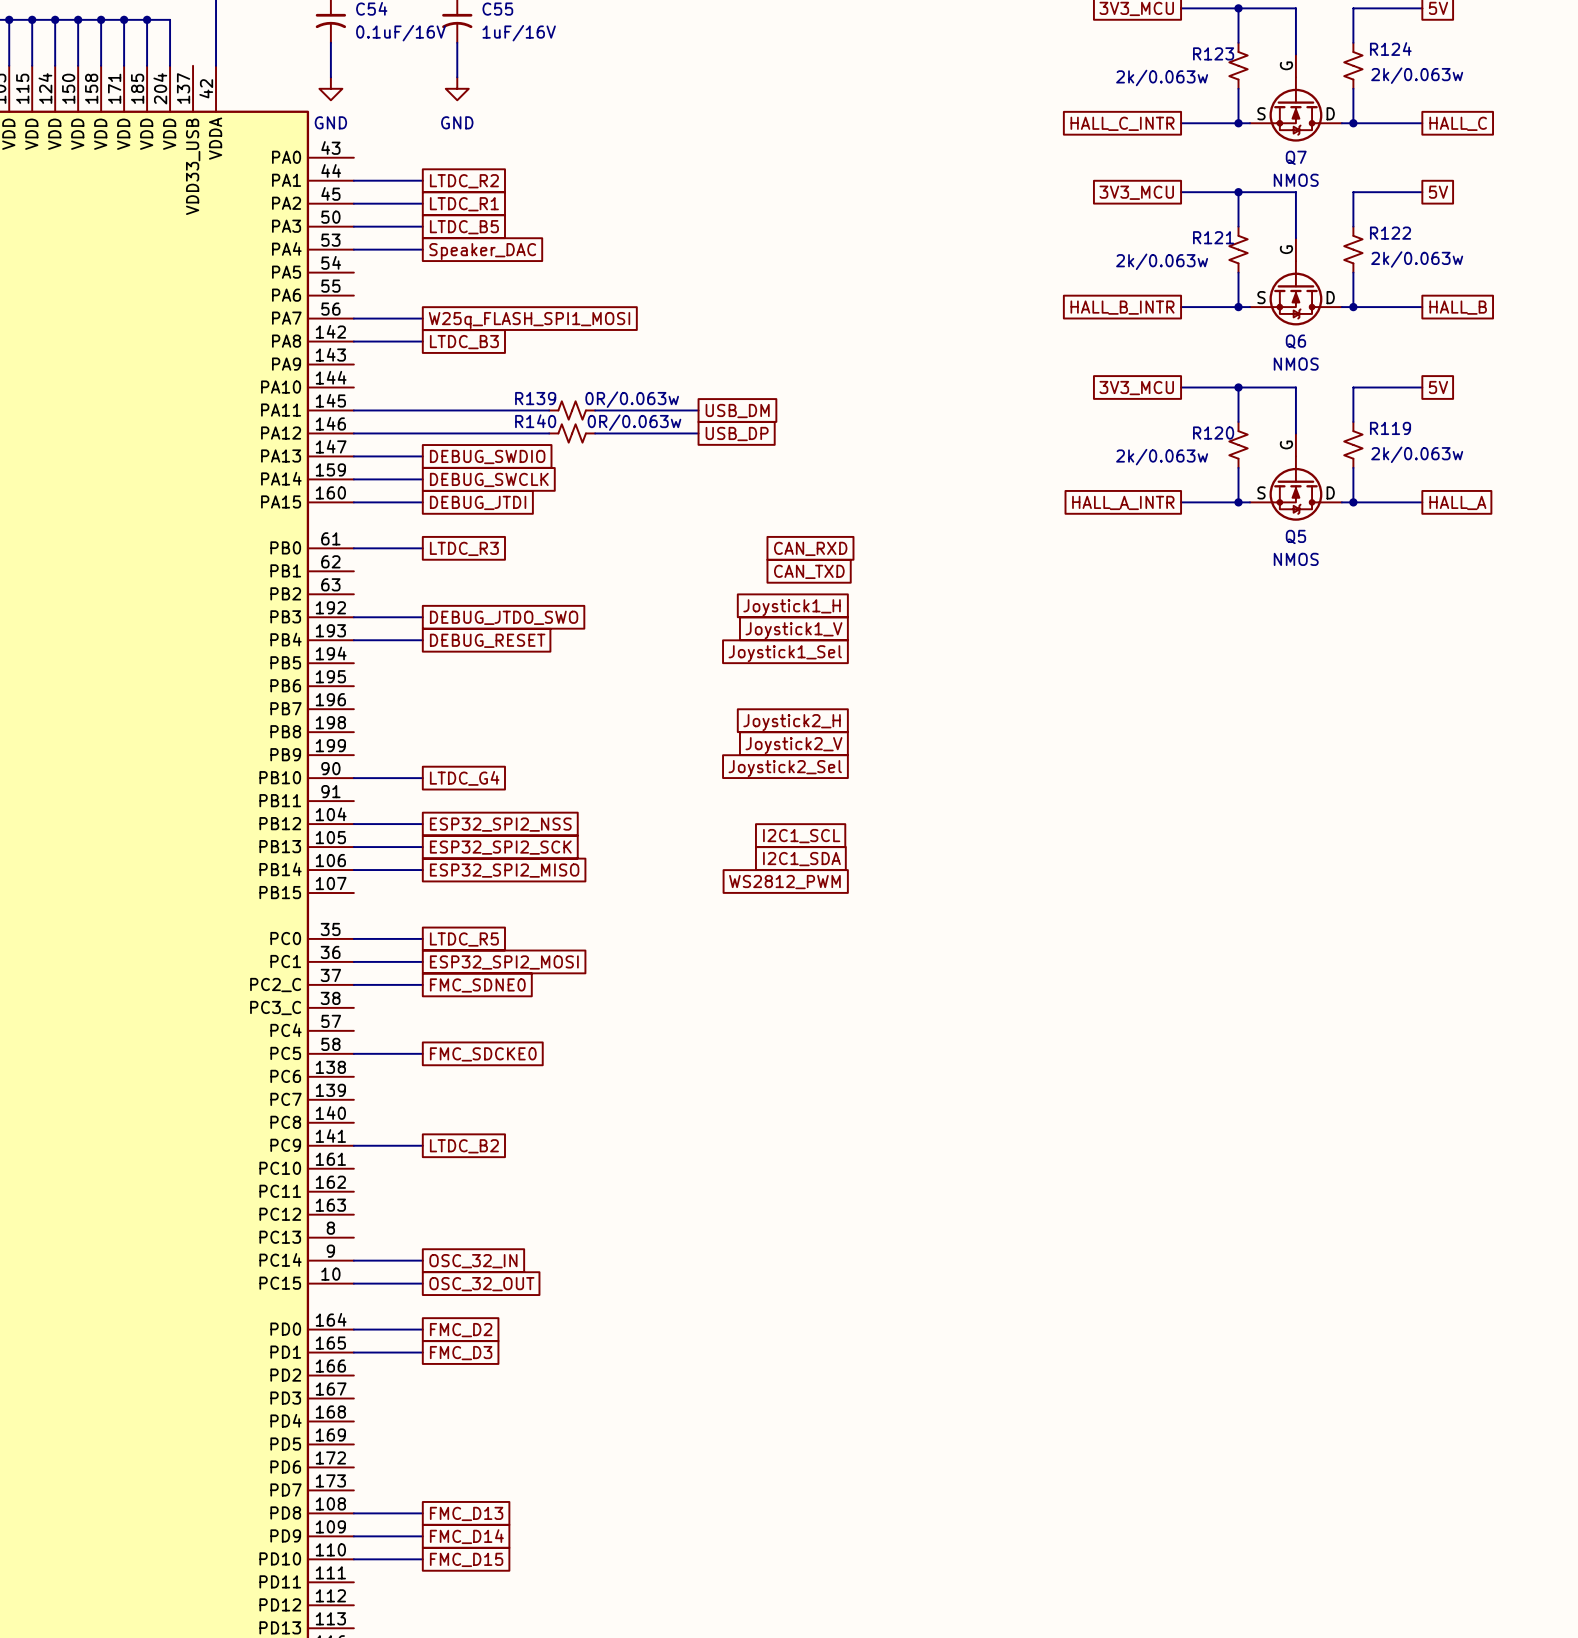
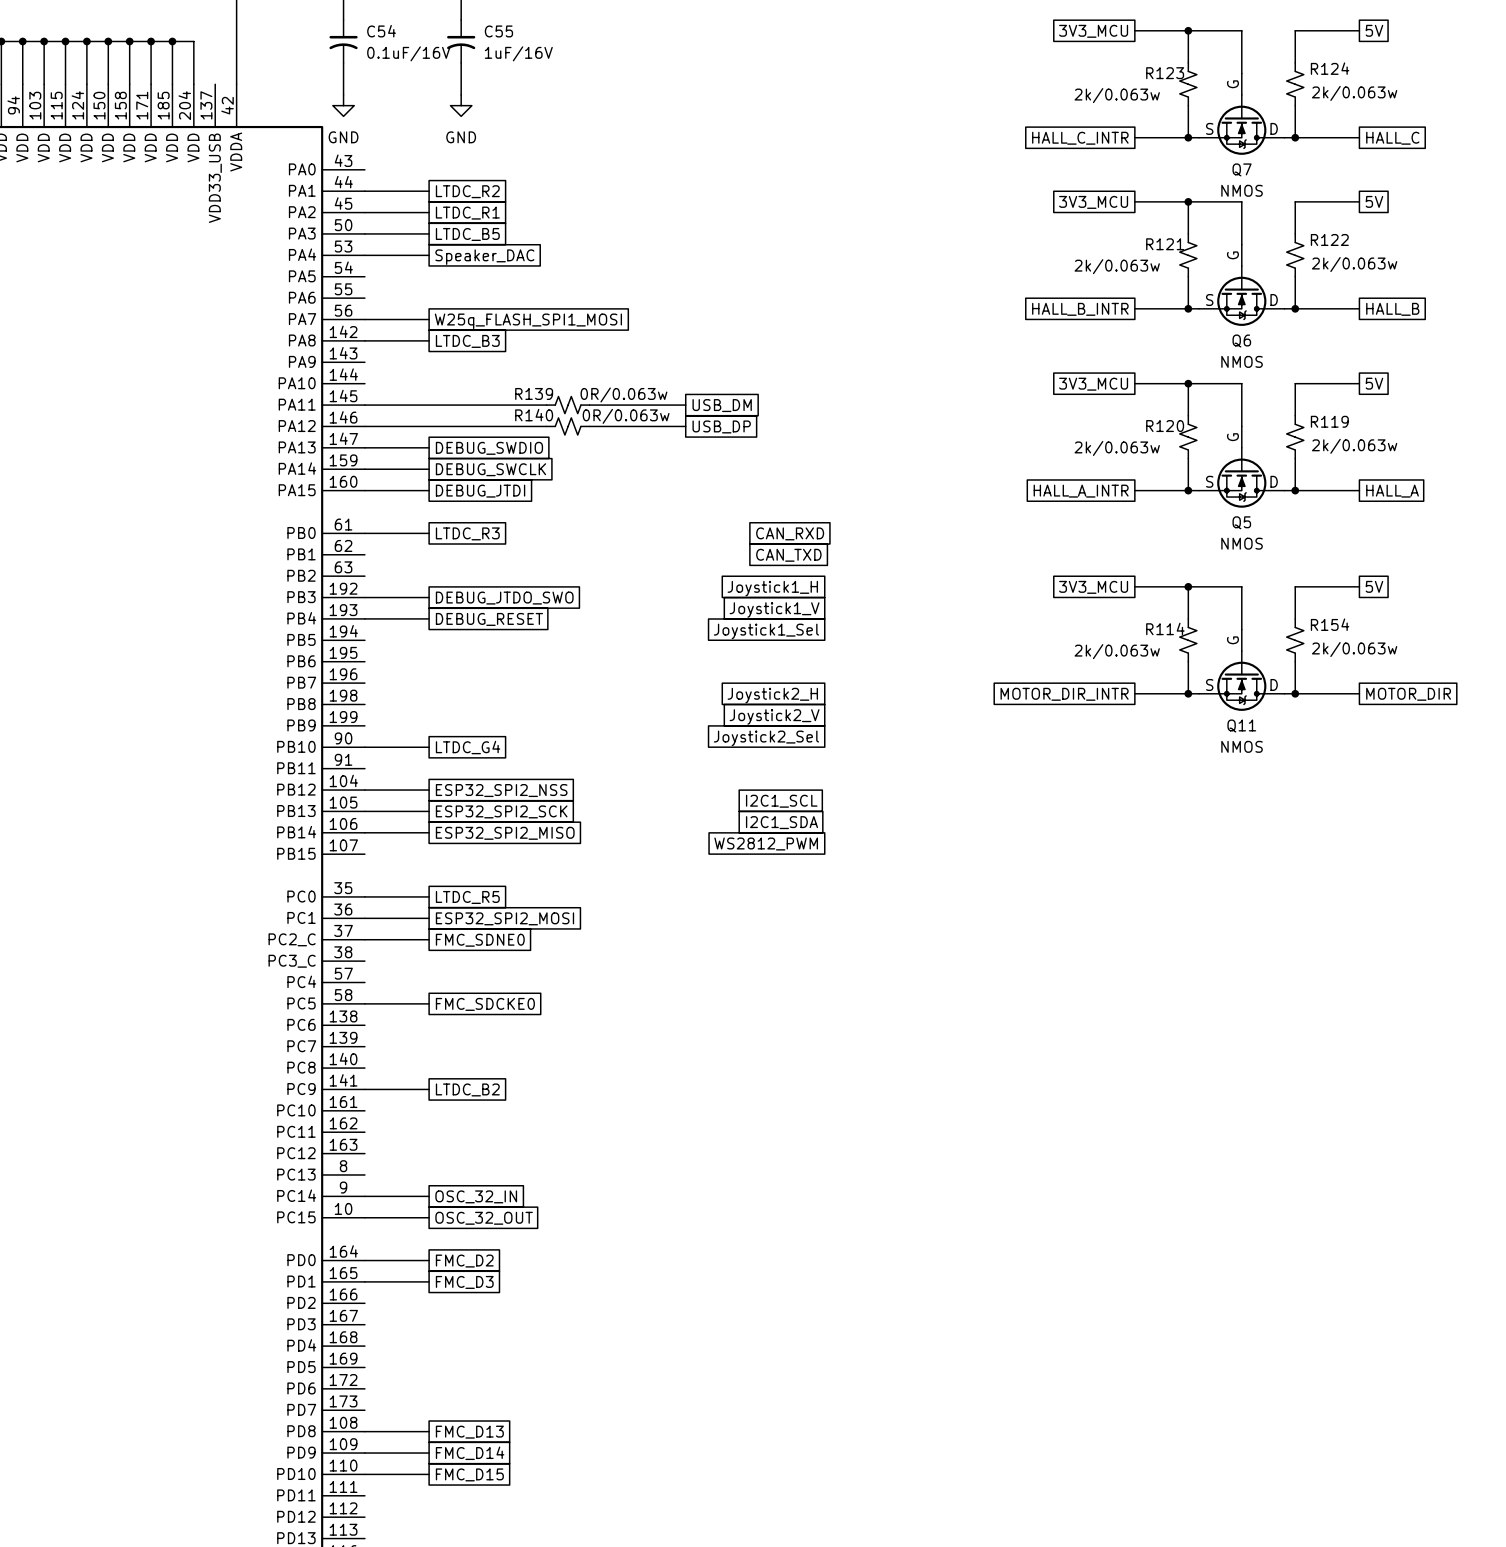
wire: none -> (1134, 586) (1241, 586) (1241, 629)
wire: none -> (1188, 586) (1188, 618)
junction: none -> (1188, 586)
wire: none -> (1359, 586) (1295, 586) (1295, 618)
global label: none -> 5V (1374, 586)
global label: none -> 3V3_MCU (1093, 587)
R114: none -> 2k/0.063w (1188, 640)
R154: none -> 2k/0.063w (1295, 640)
wire: none -> (1188, 661) (1188, 693)
wire: none -> (1295, 661) (1295, 693)
Q11: none -> NMOS (1241, 670)
wire: none -> (1134, 693) (1199, 693)
junction: none -> (1188, 693)
wire: none -> (1284, 693) (1359, 693)
junction: none -> (1295, 693)
global label: none -> MOTOR_DIR_INTR (1064, 694)
global label: none -> MOTOR_DIR (1408, 694)

